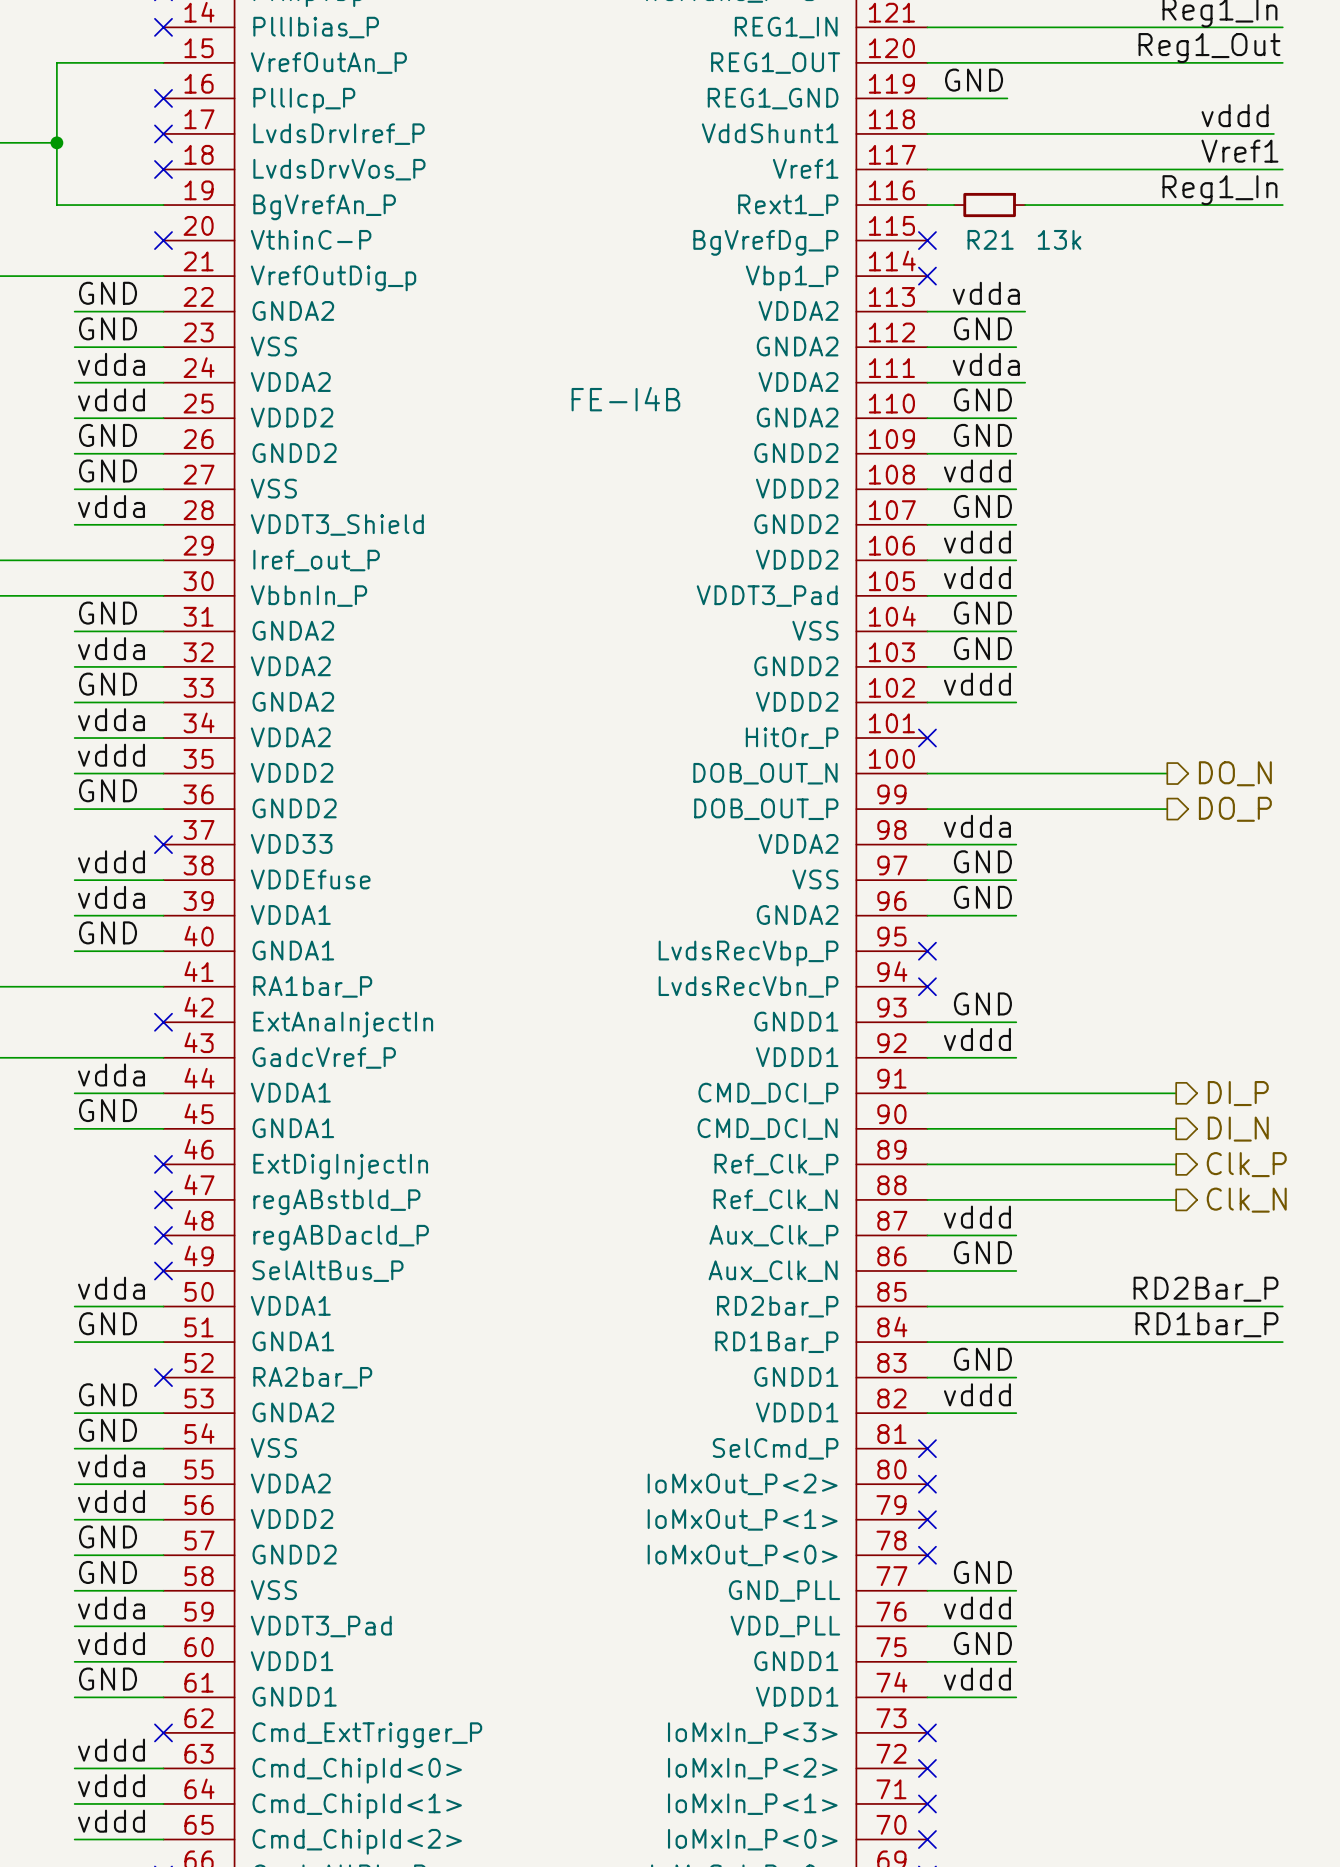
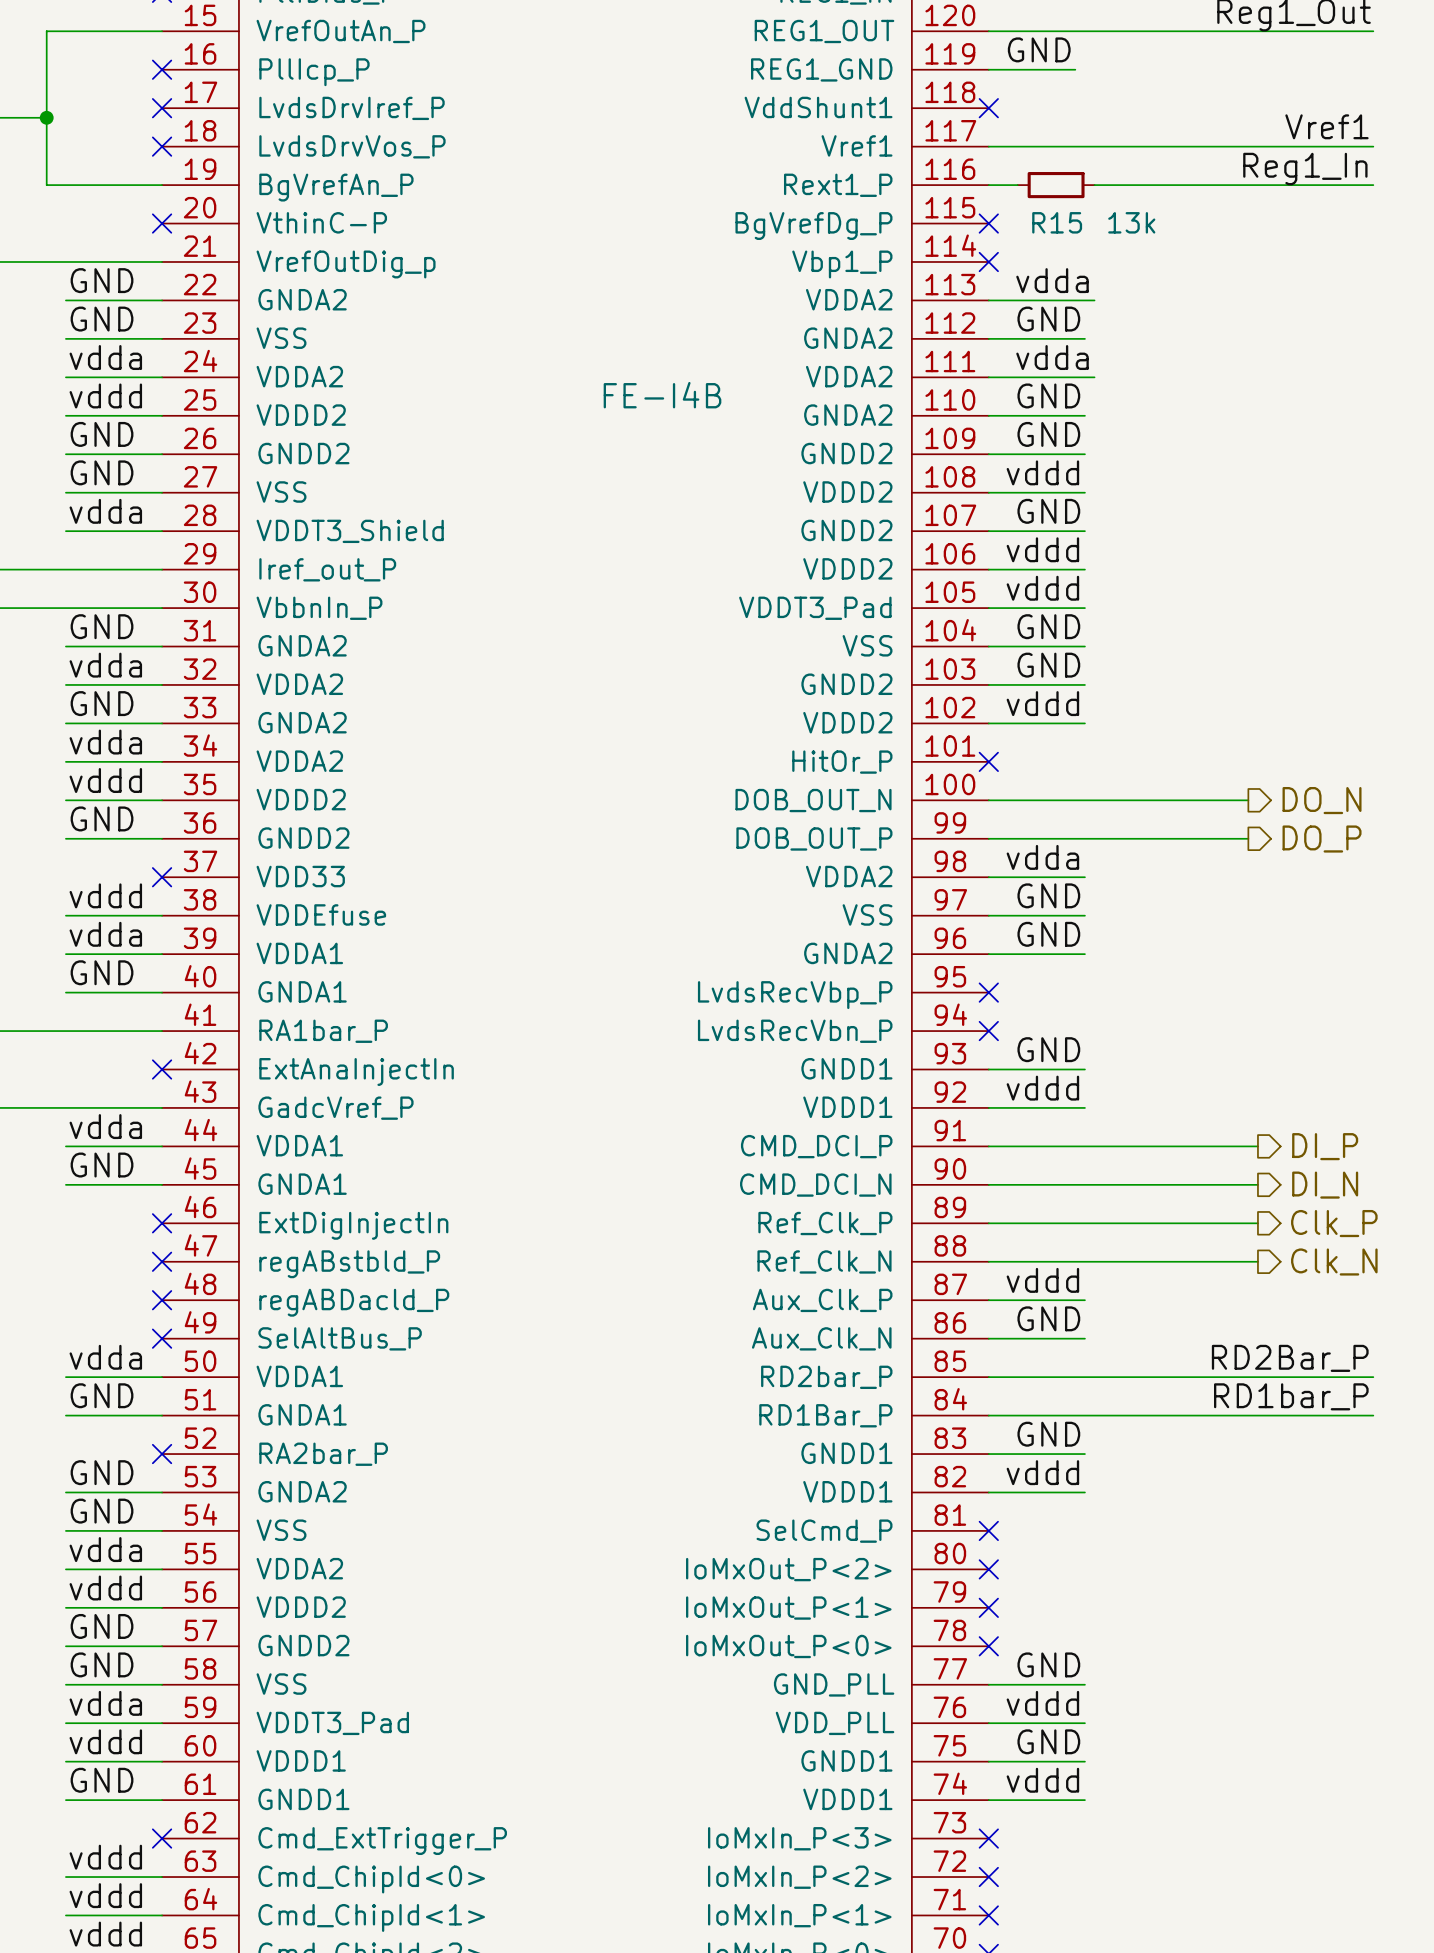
label: vddd (1235, 115) -> none
wire: (927, 133) (1273, 133) -> none
no-connect mark: none -> (988, 108)
R21 name: R21 (990, 239) -> R15 (1057, 222)

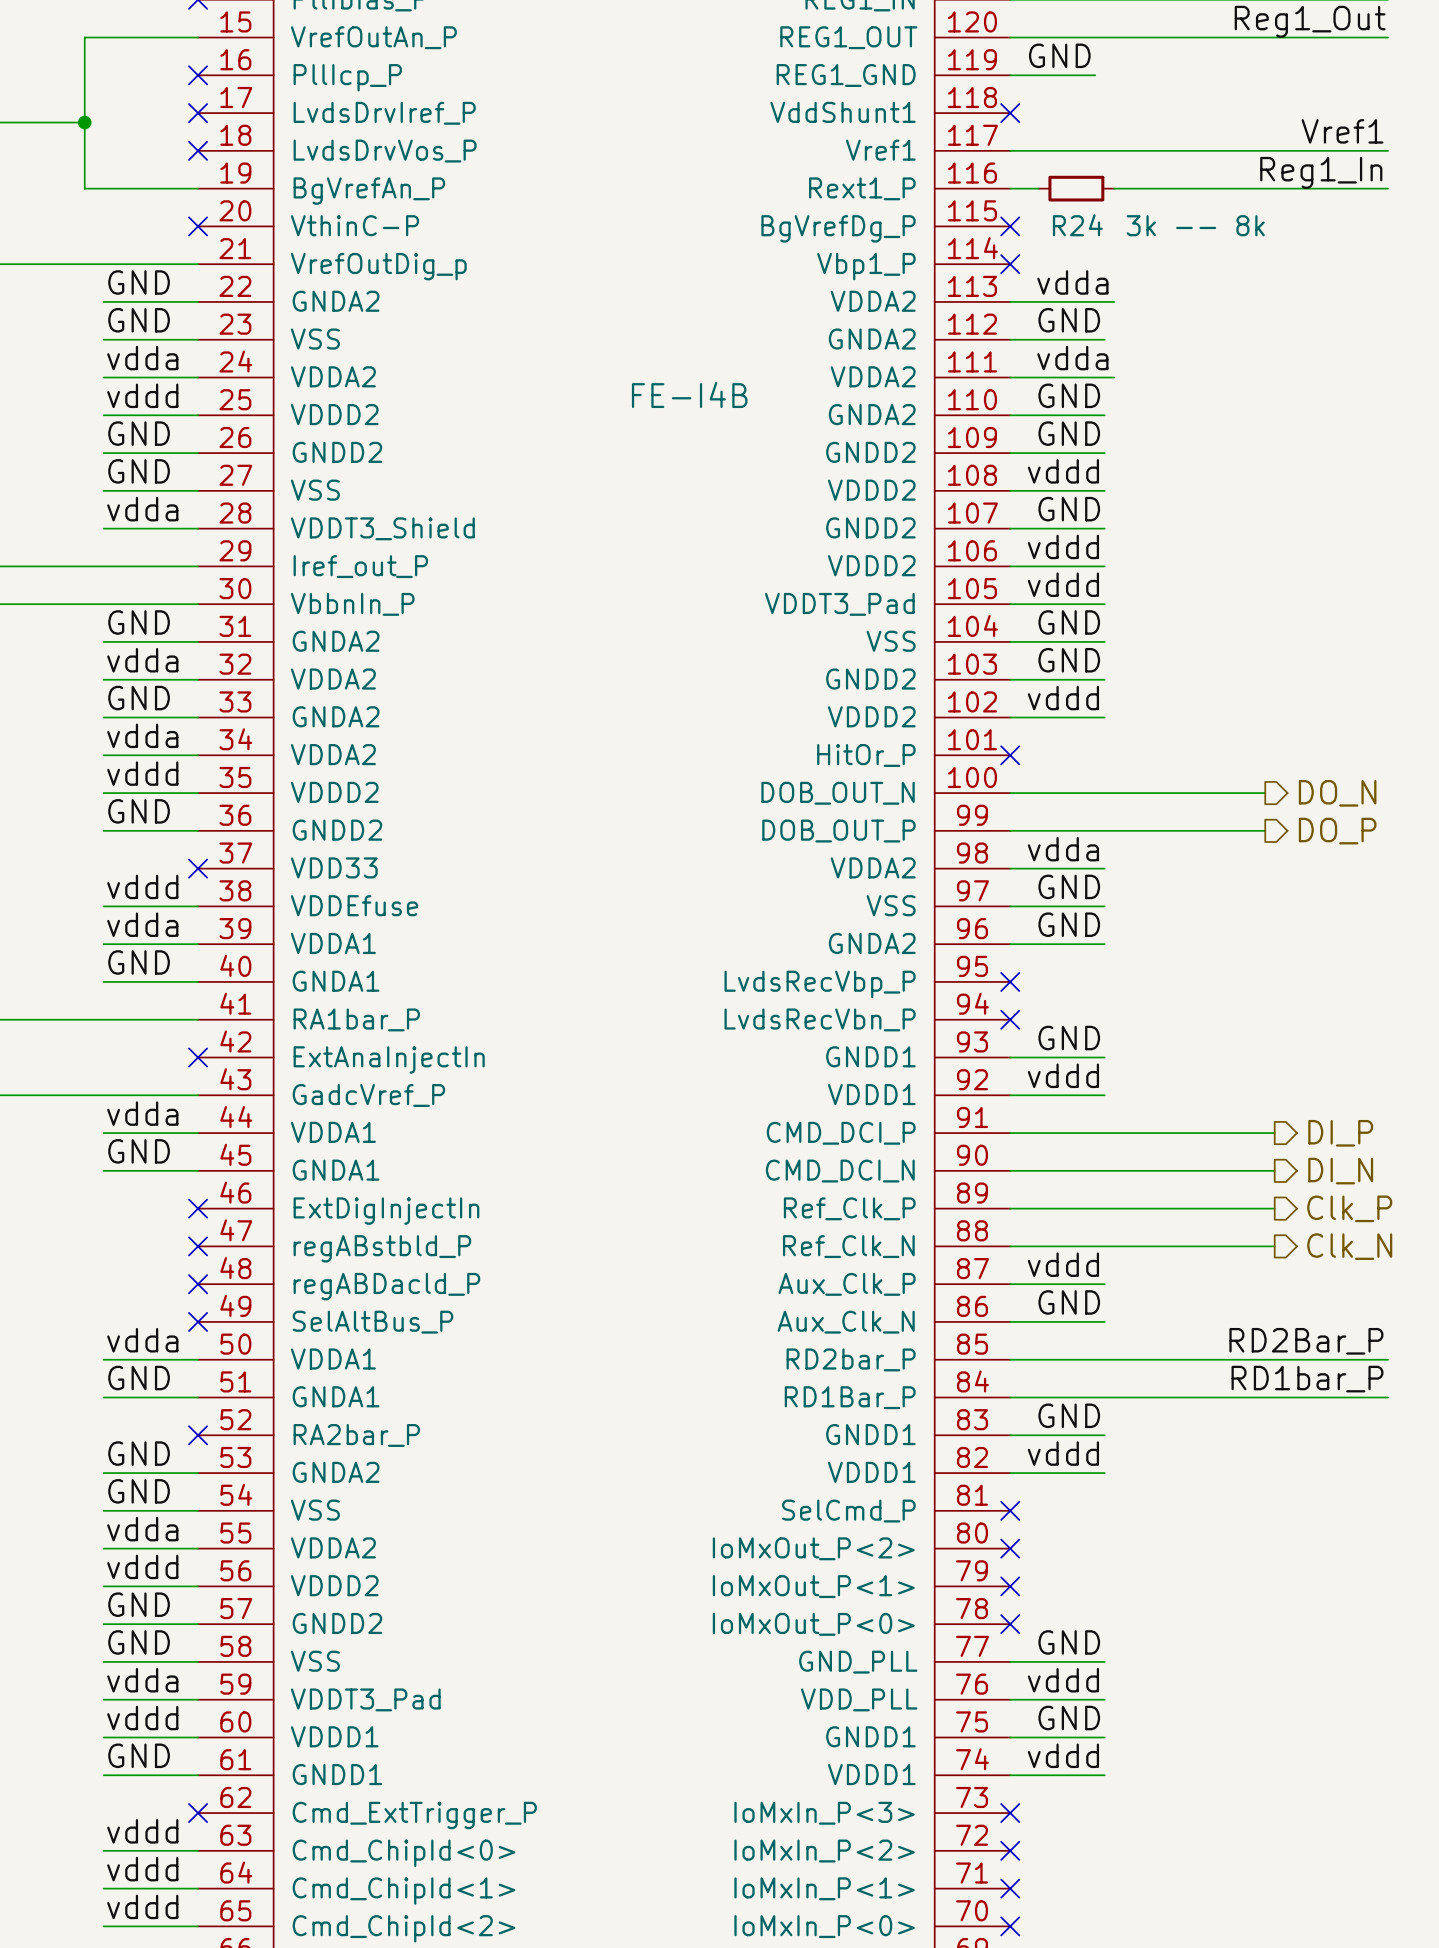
R15 name: R15 (1057, 222) -> R24 (1077, 225)
R15 value: 13k (1131, 222) -> 3k -- 8k (1195, 225)

